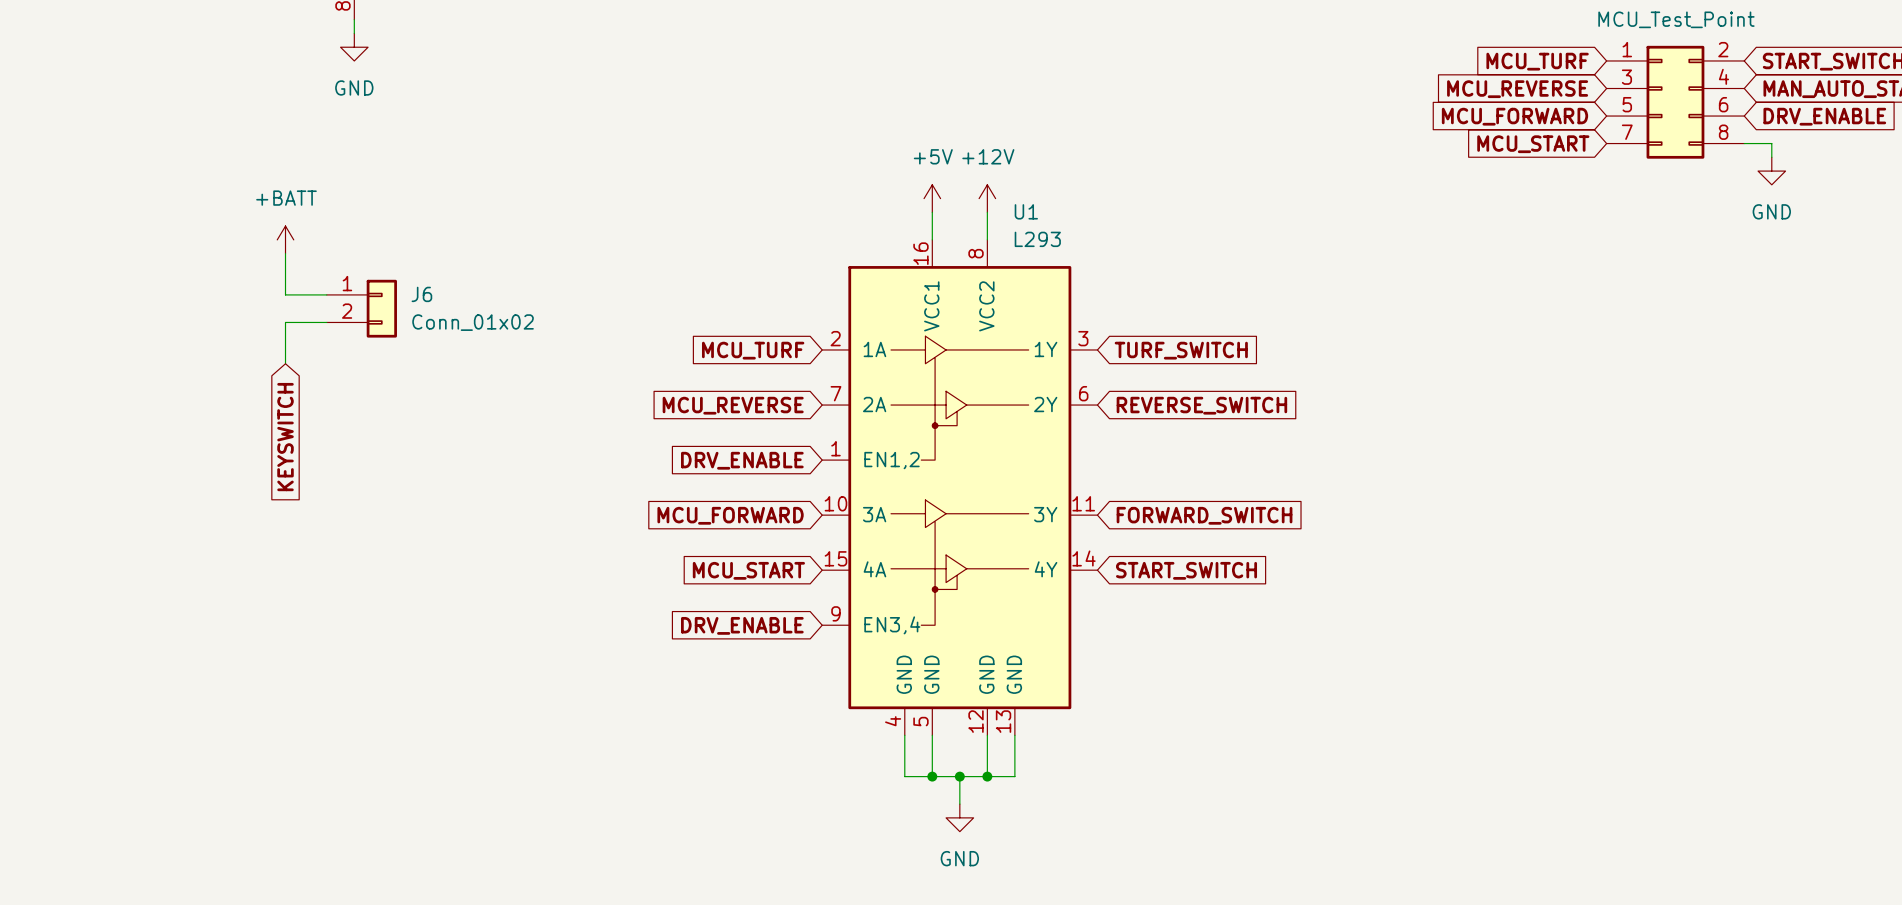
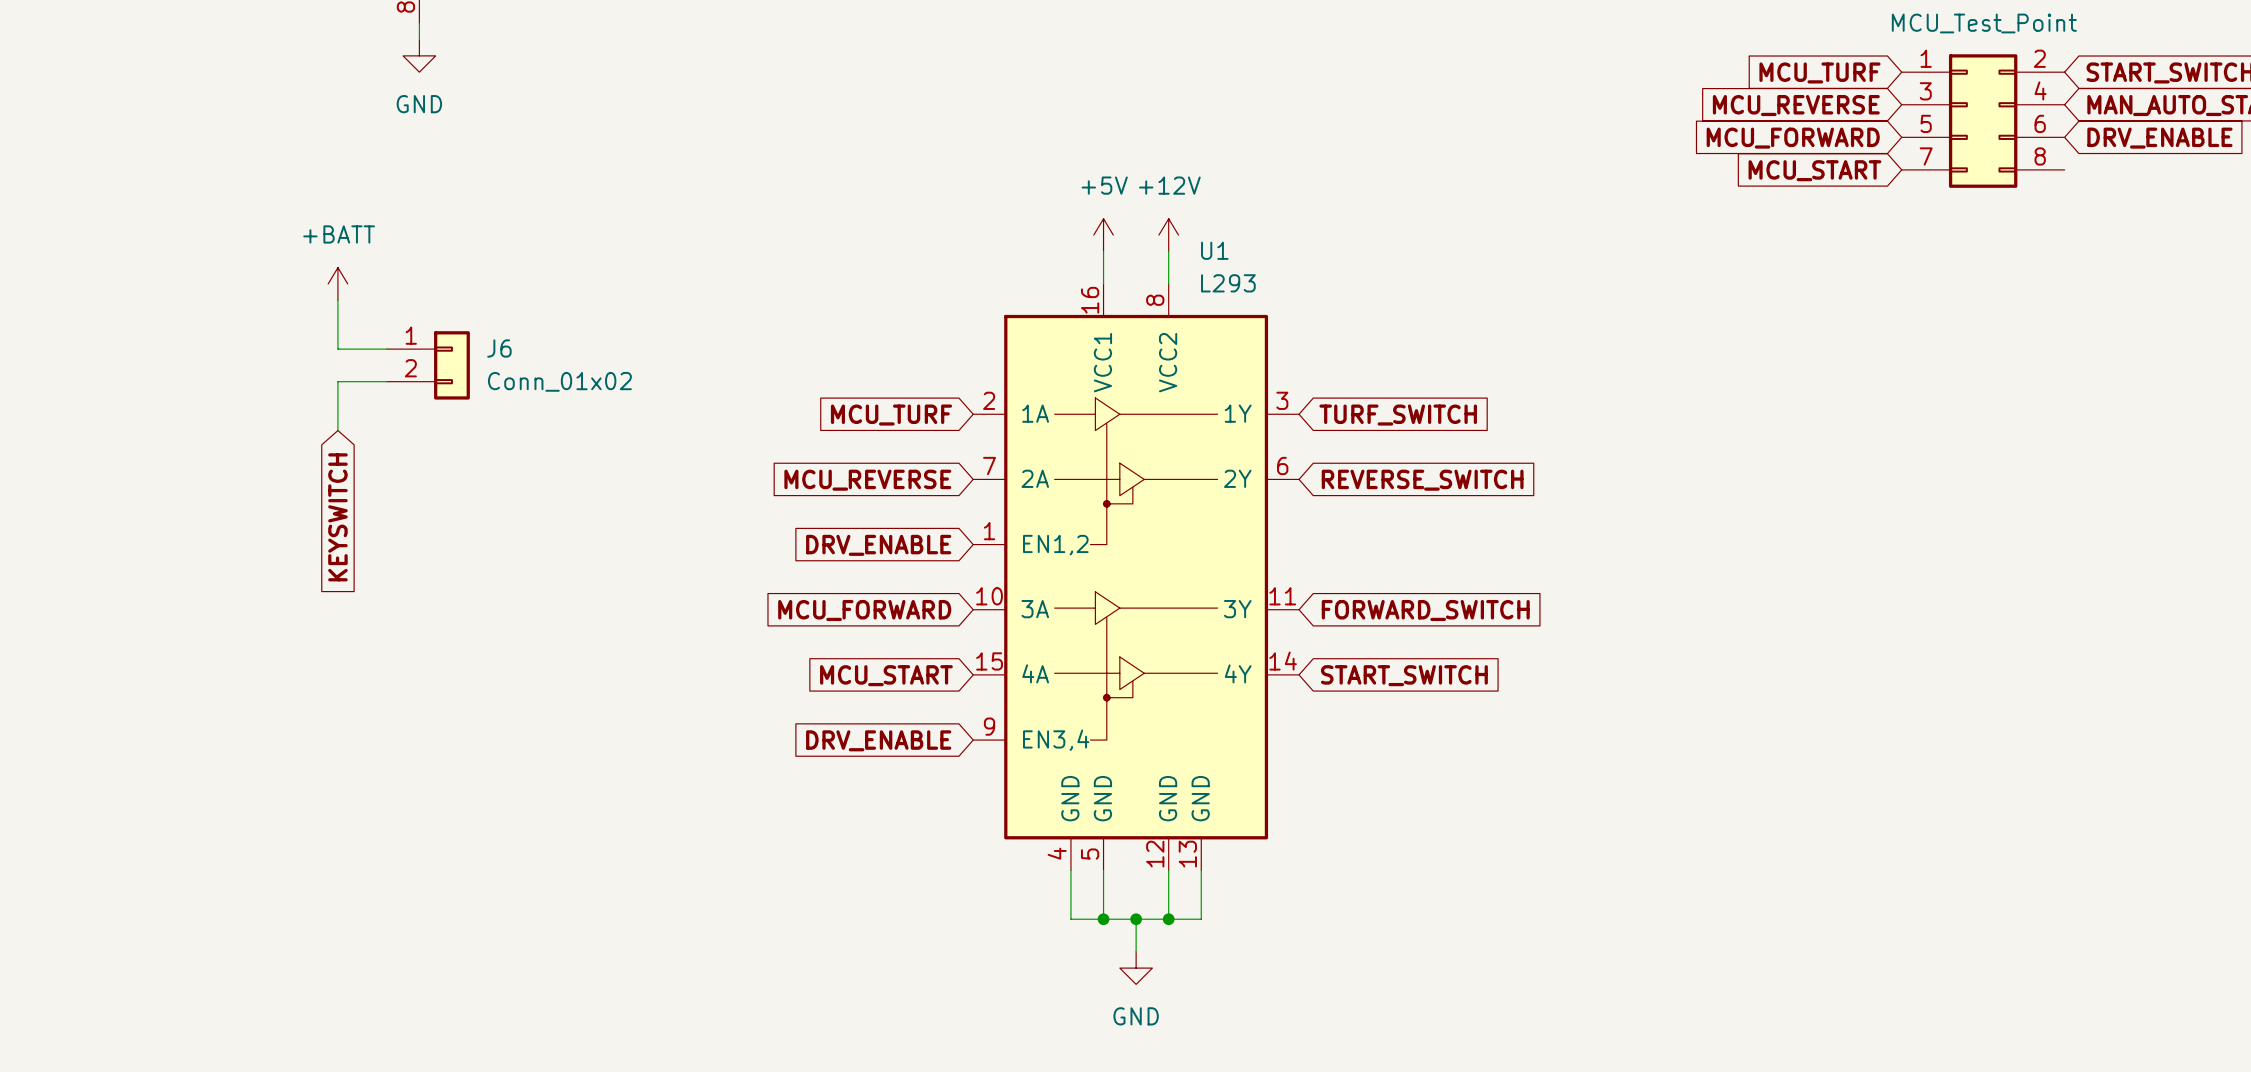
wire: (1744, 143) (1771, 143) (1771, 157) -> none
power symbol: GND (1771, 171) -> none

